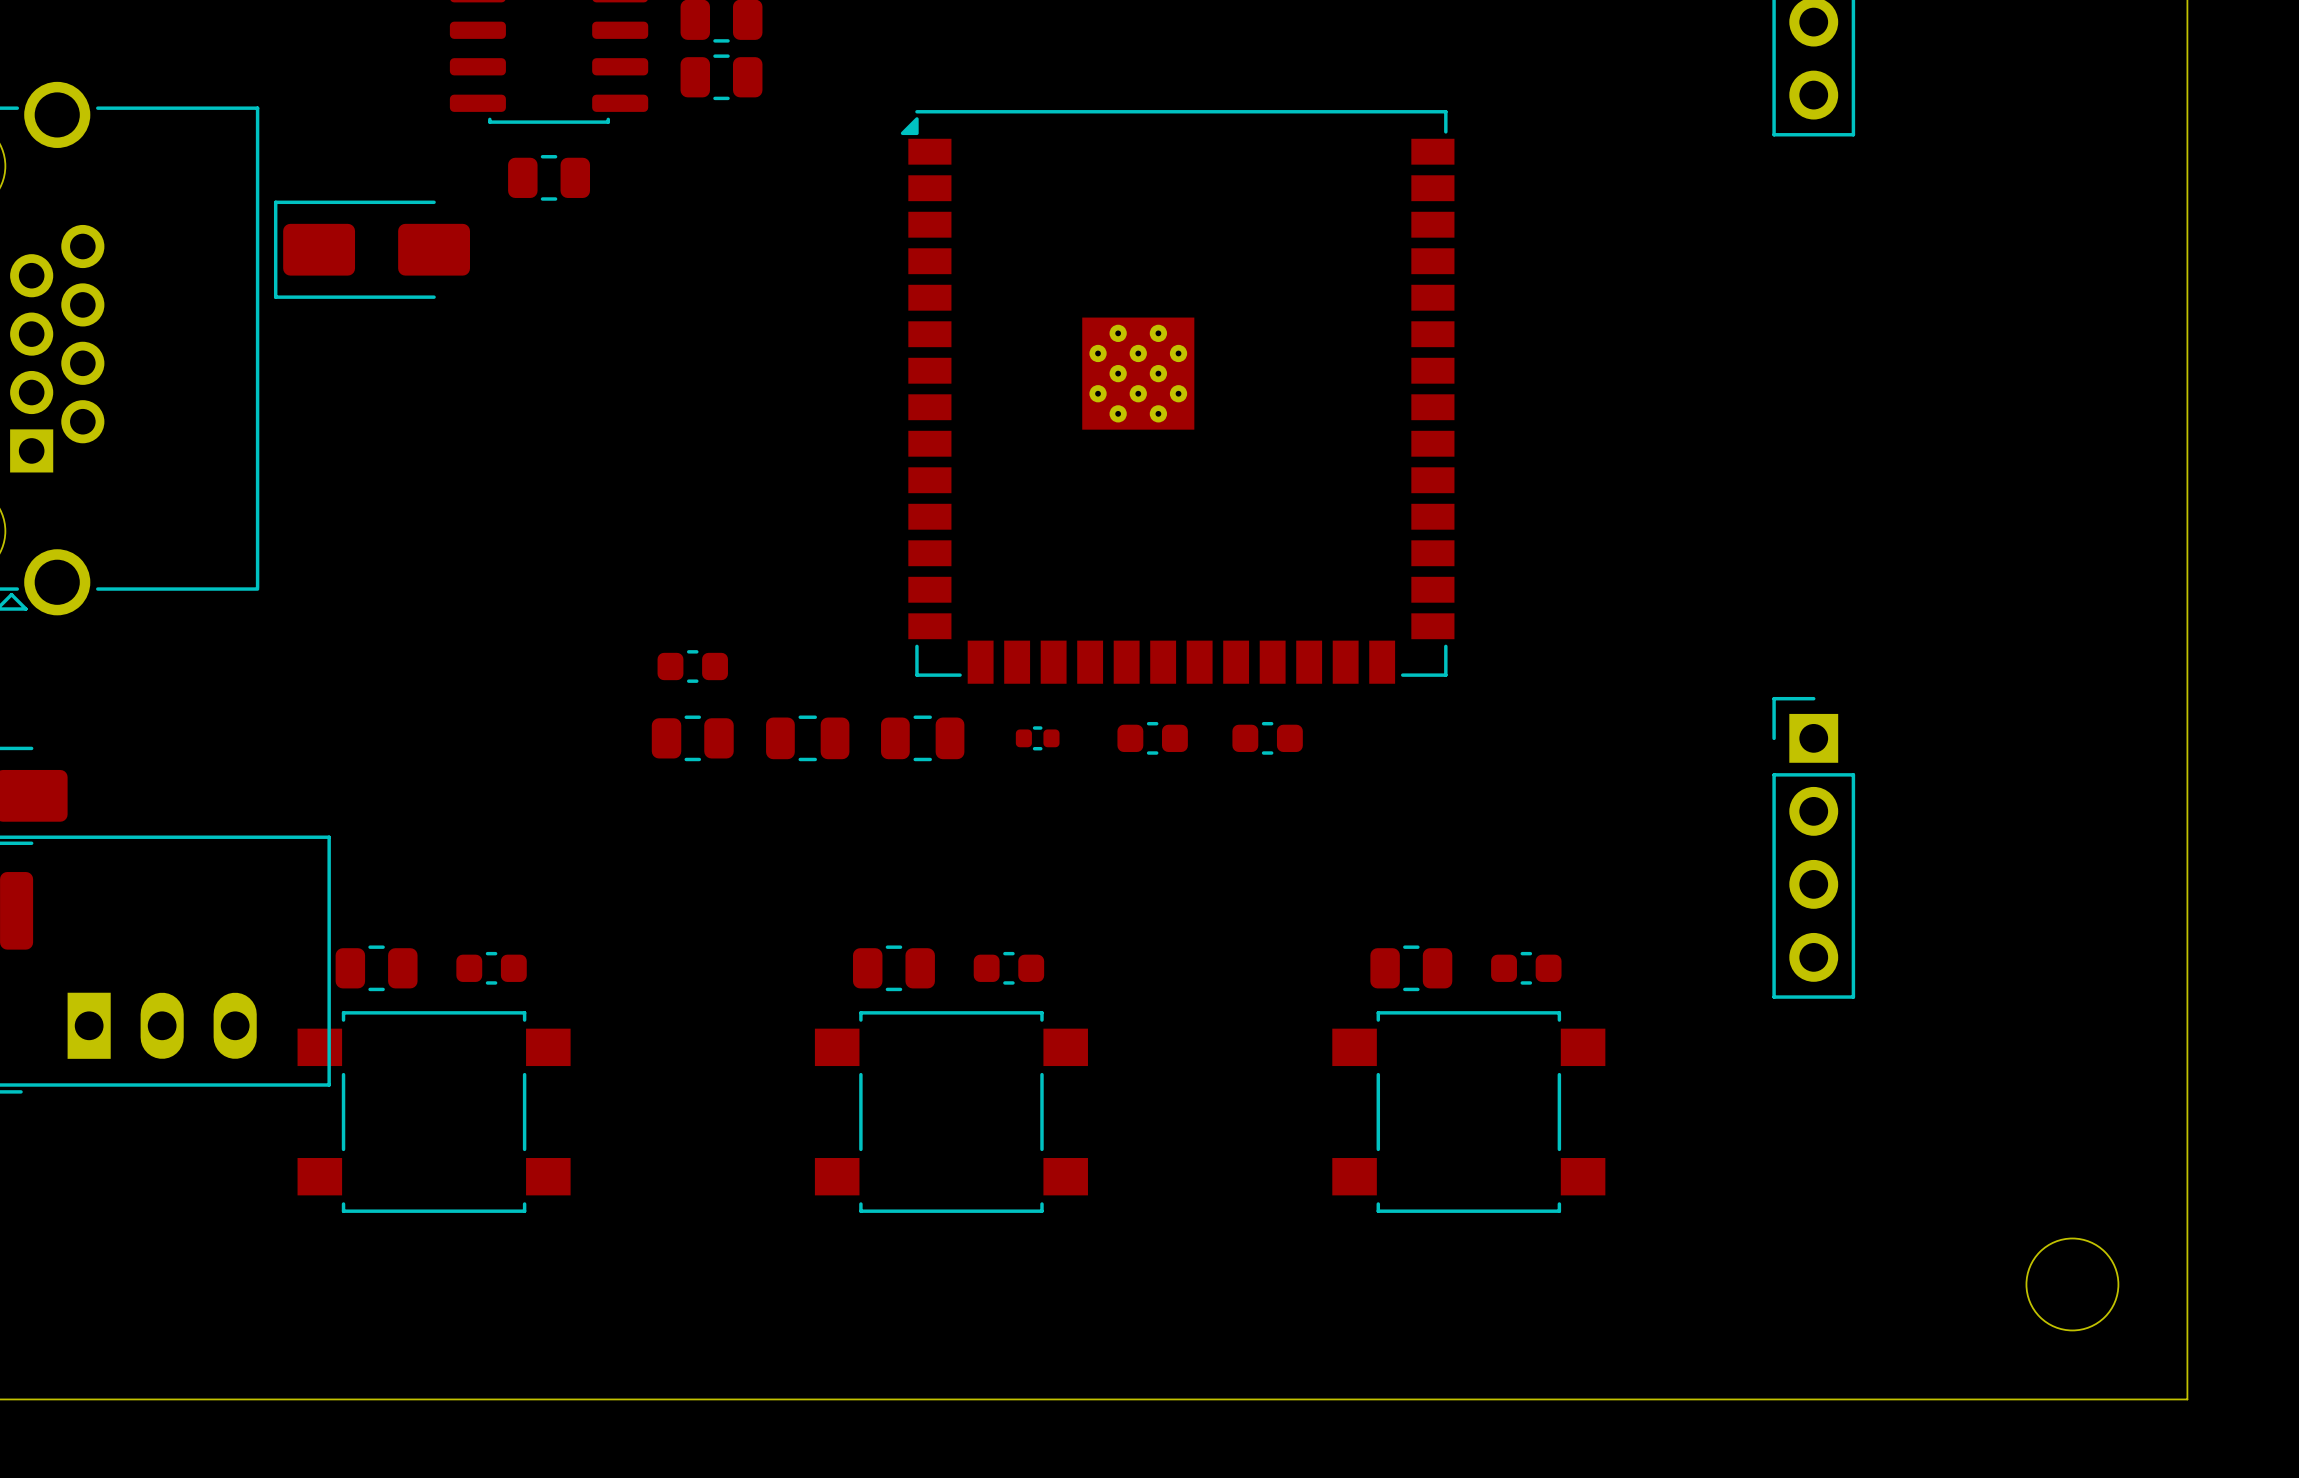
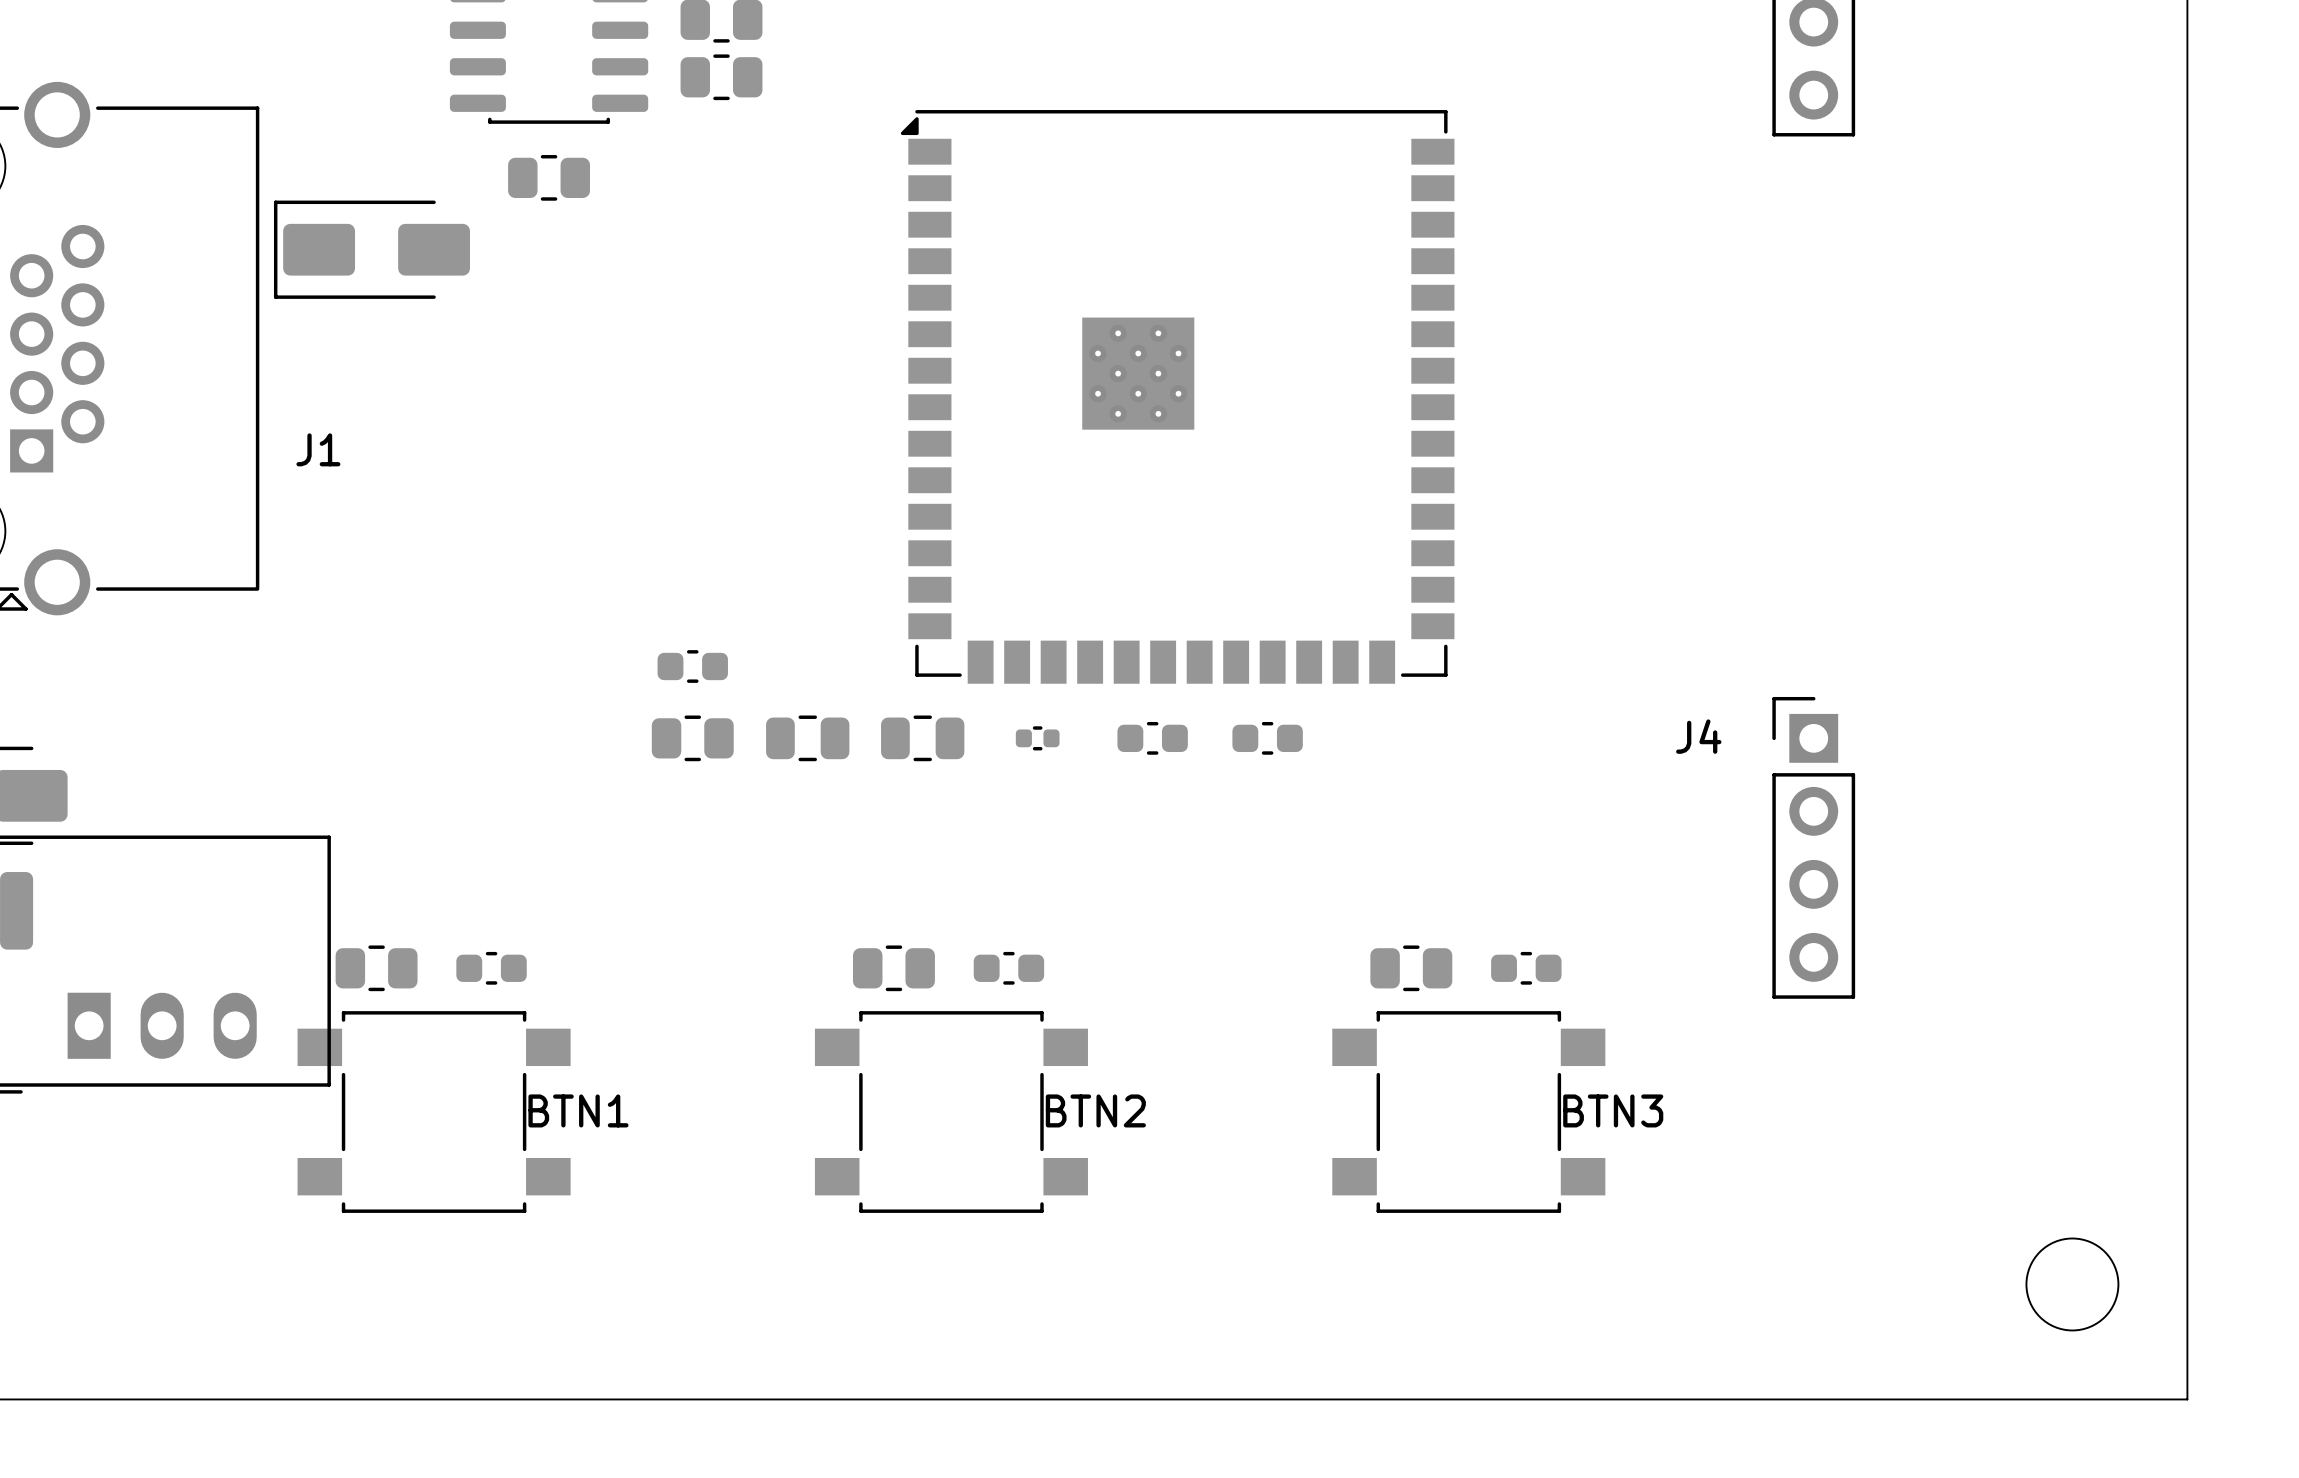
part text: none -> J1 (318, 449)
part text: none -> J4 (1698, 736)
part text: none -> BTN1 (578, 1110)
part text: none -> BTN2 (1095, 1110)
part text: none -> BTN3 (1613, 1110)

